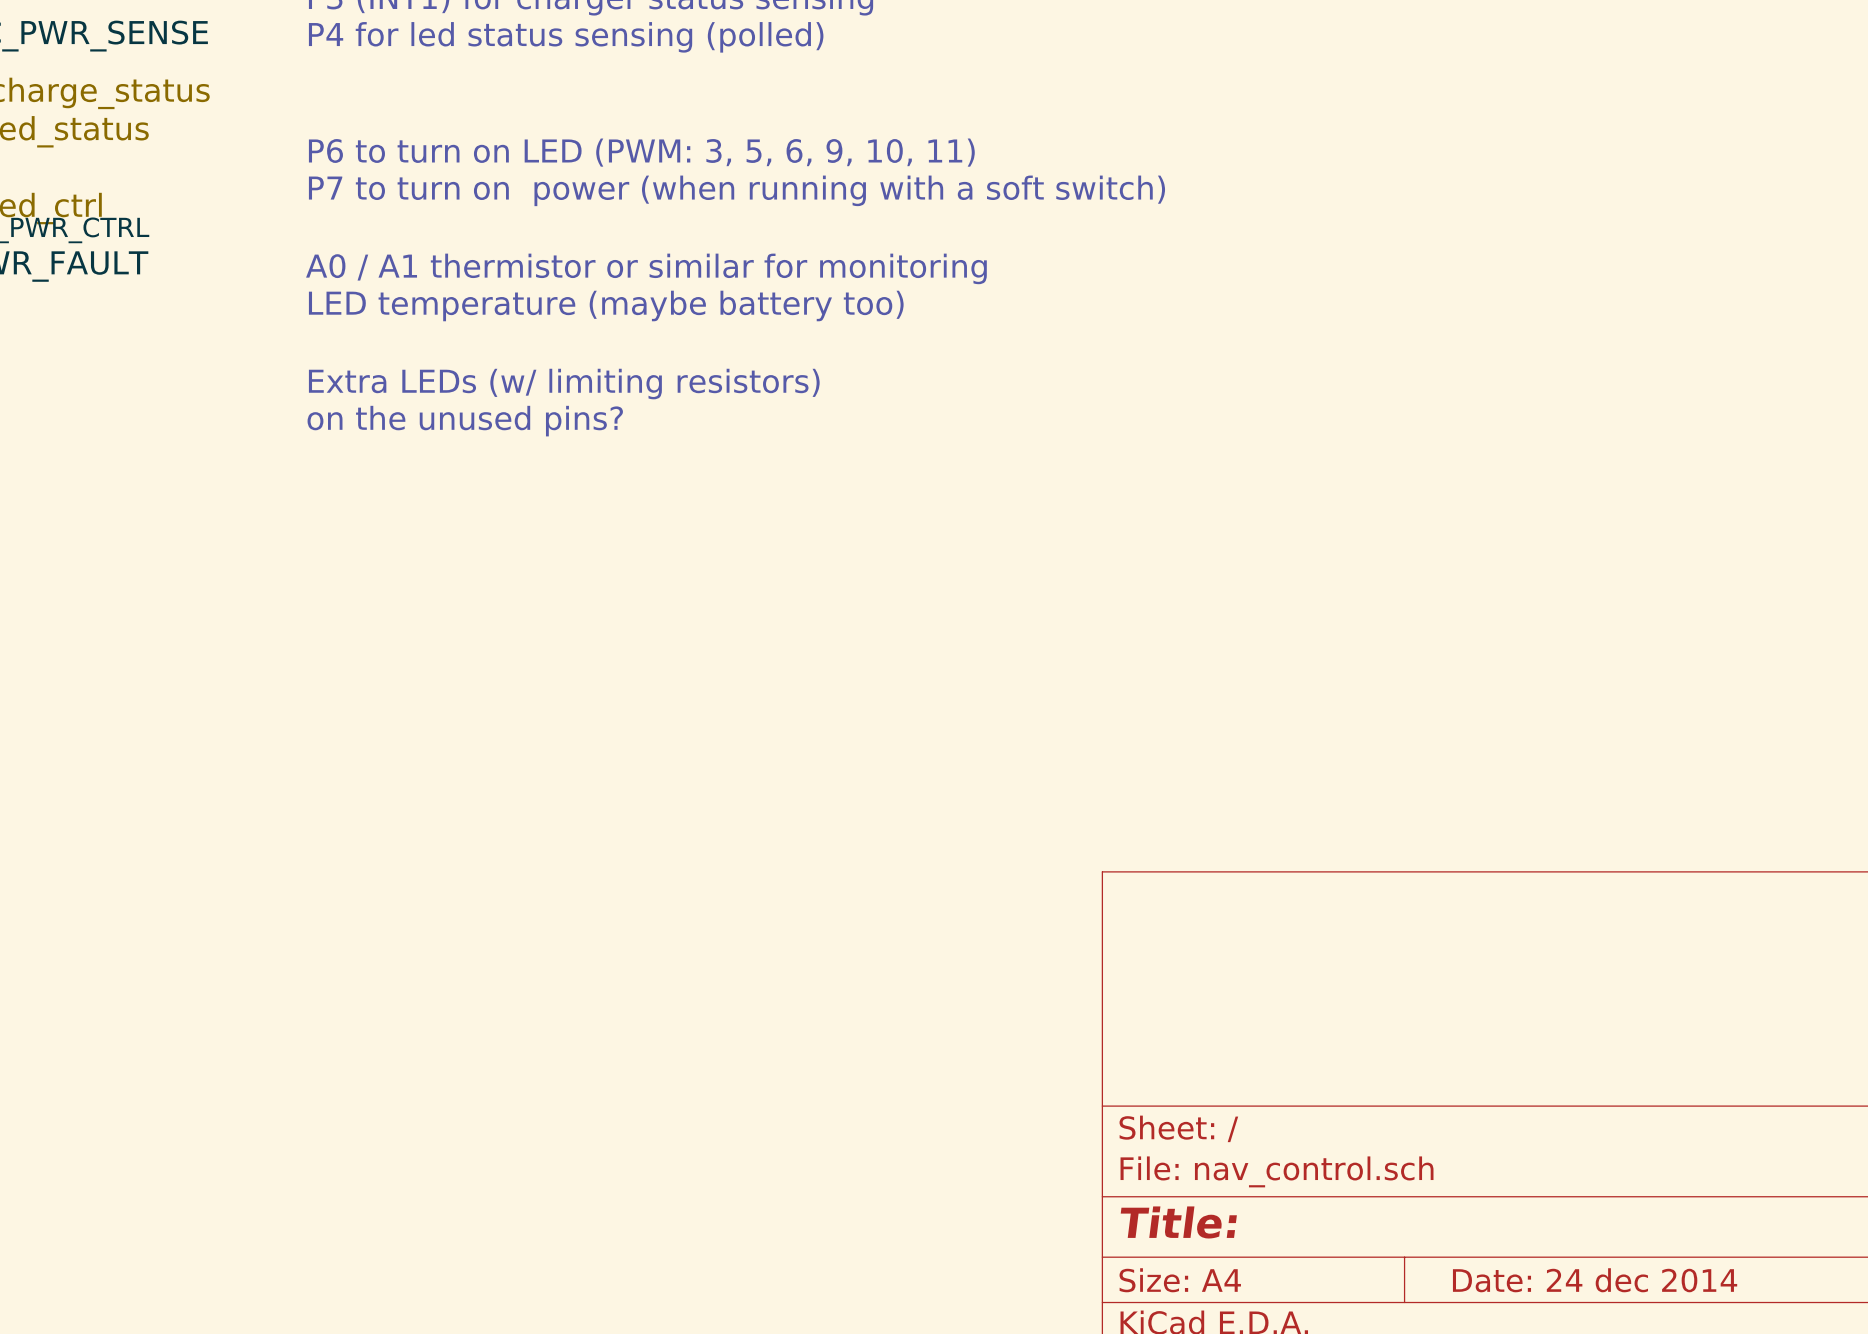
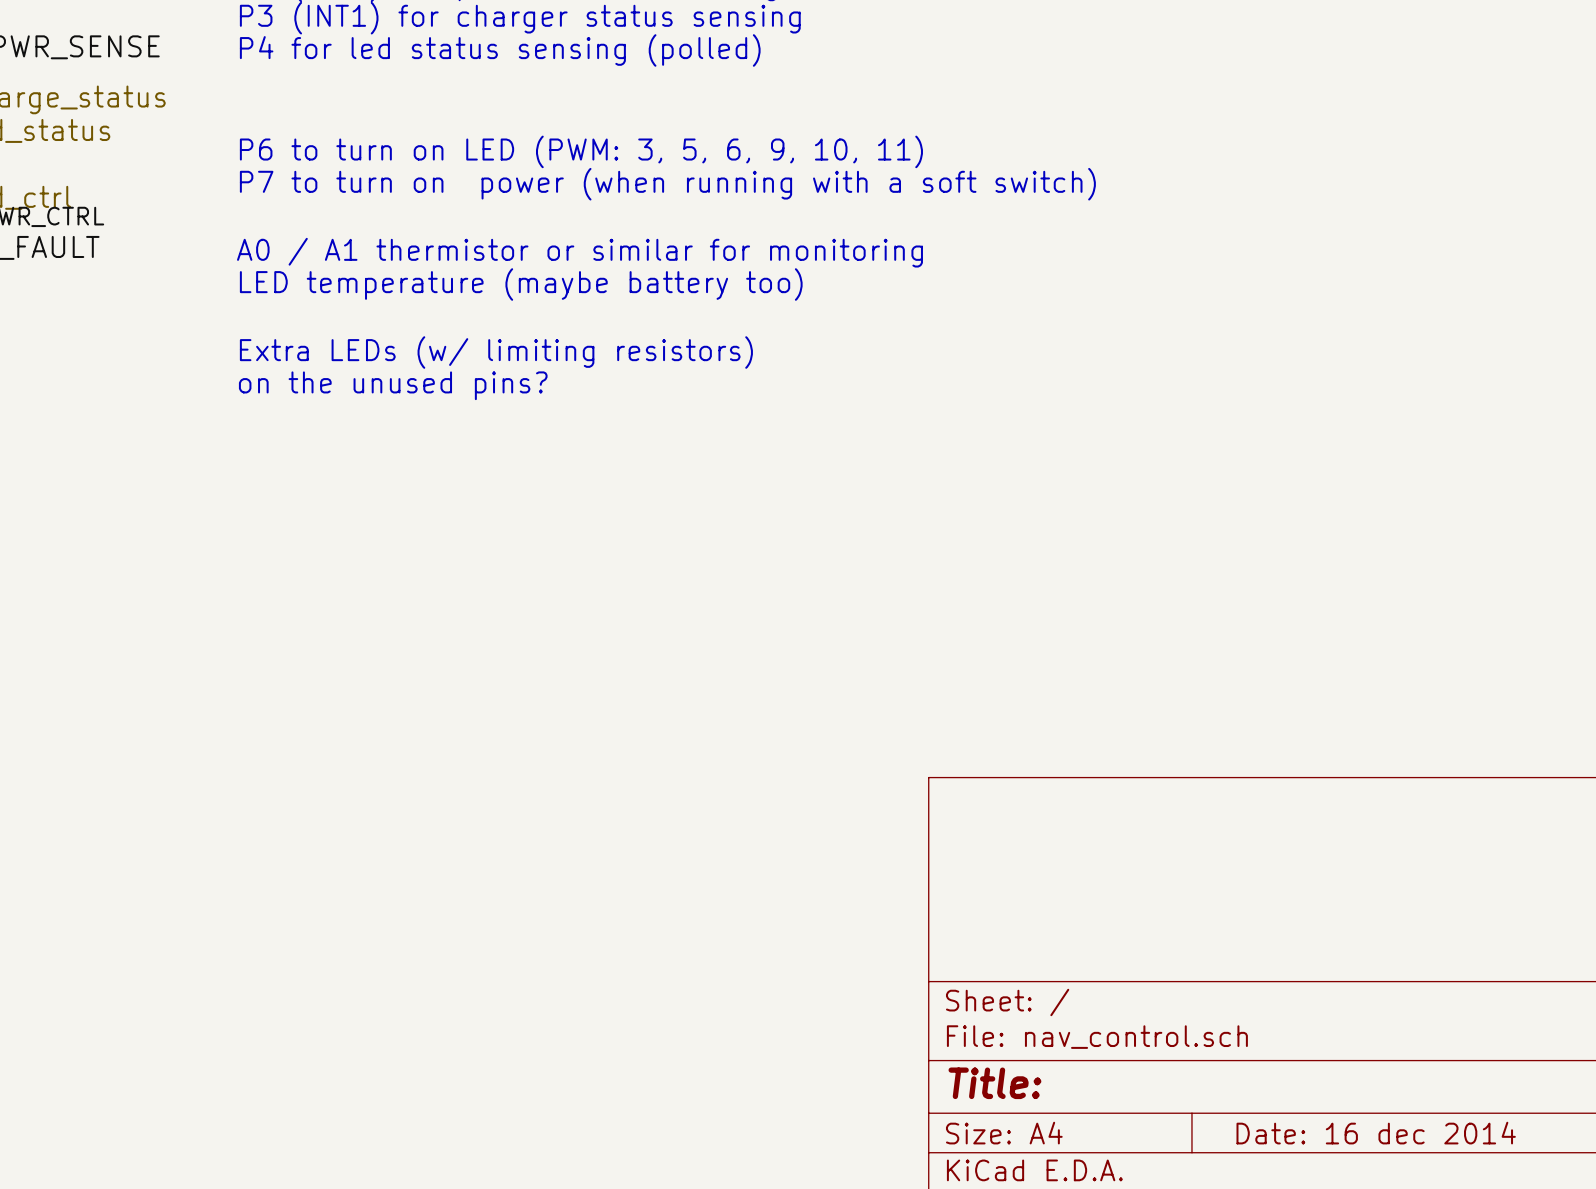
title block: Date: 24 dec 2014 (1595, 1280) -> Date: 16 dec 2014 (1376, 1133)

